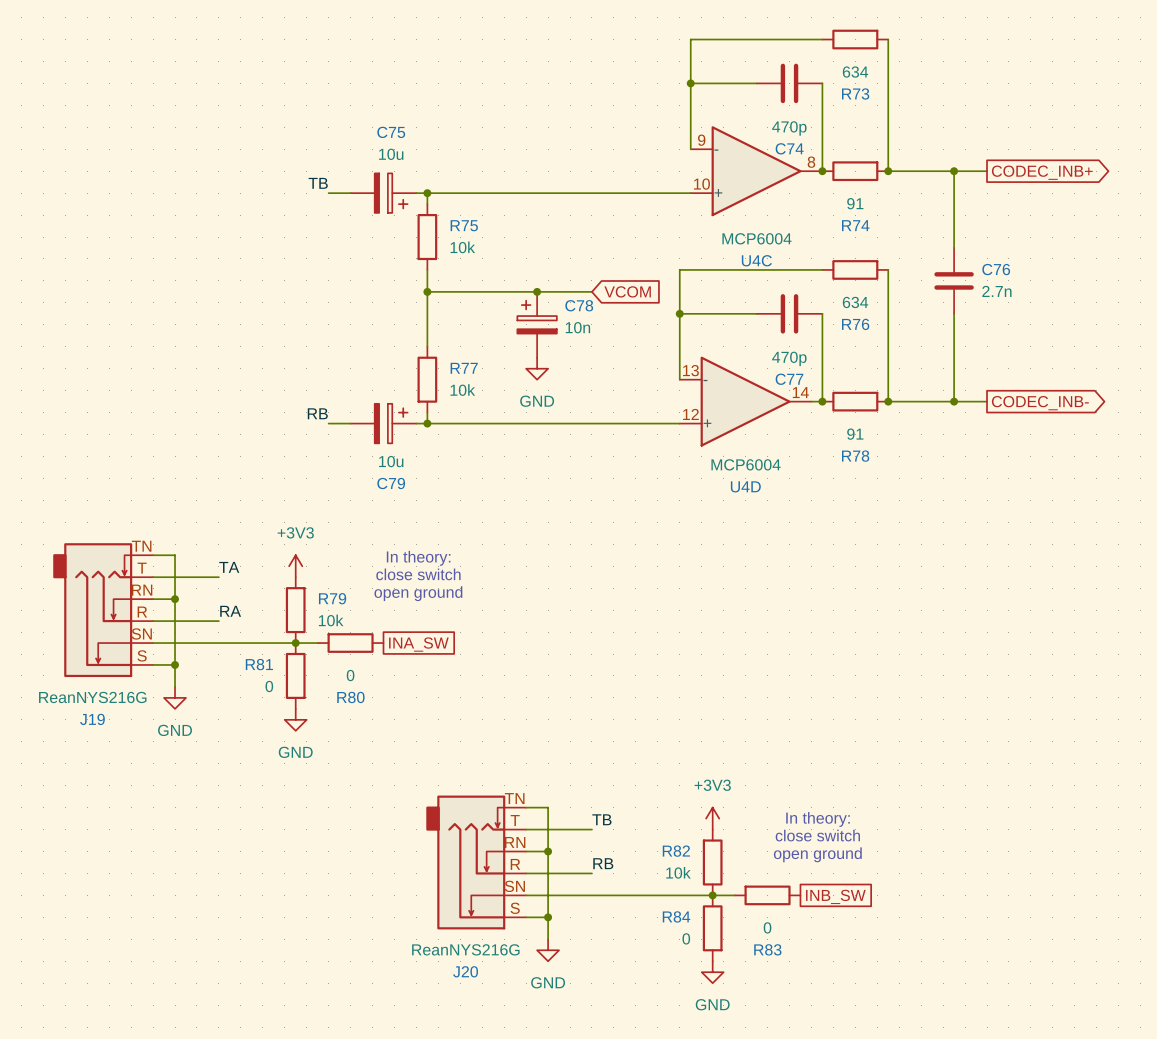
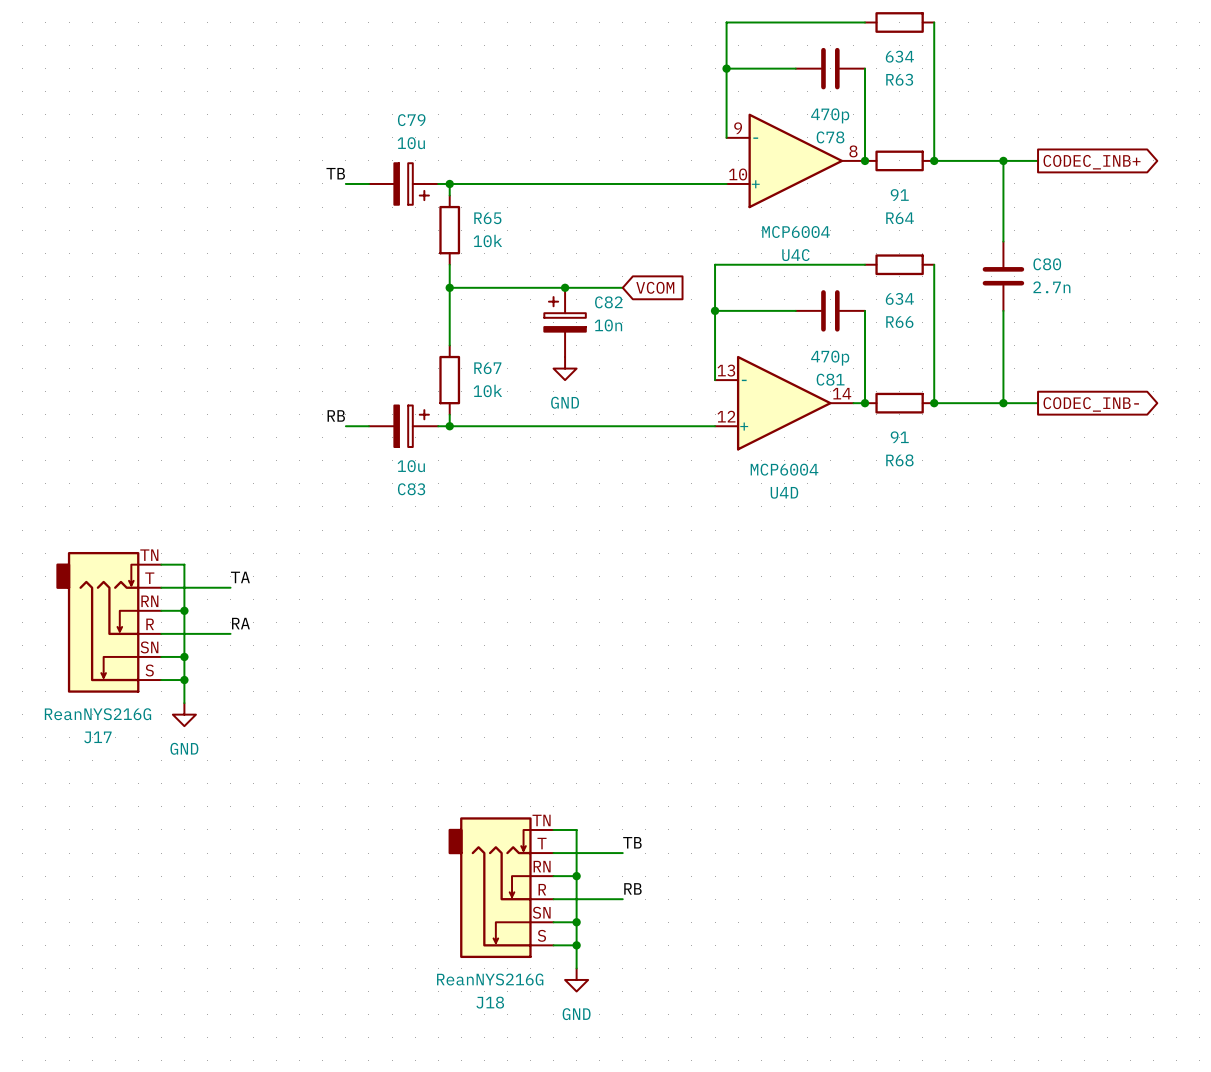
R73 name: R73 (855, 93) -> R63 (899, 79)
C75 name: C75 (391, 132) -> C79 (411, 120)
C74 name: C74 (789, 148) -> C78 (830, 137)
R75 name: R75 (464, 225) -> R65 (487, 218)
R74 name: R74 (855, 225) -> R64 (900, 218)
C76 name: C76 (996, 269) -> C80 (1047, 264)
C78 name: C78 (579, 305) -> C82 (608, 302)
R76 name: R76 (855, 324) -> R66 (899, 322)
R77 name: R77 (464, 368) -> R67 (487, 368)
C77 name: C77 (789, 379) -> C81 (830, 379)
R78 name: R78 (855, 456) -> R68 (899, 460)
C79 name: C79 (391, 483) -> C83 (411, 489)
text: In theory: (418, 558) -> none
power symbol: +3V3 (295, 566) -> none
text: close switch (418, 574) -> none
text: open ground (418, 593) -> none
R79: 10k (295, 610) -> none
wire: (175, 643) (317, 643) -> none
junction: none -> (184, 656)
junction: (295, 643) -> none
R80: 0 (350, 643) -> none
global label: INA_SW (418, 644) -> none
R81: 0 (295, 675) -> none
J19 name: J19 (92, 719) -> J17 (97, 737)
power symbol: GND (295, 719) -> none
power symbol: +3V3 (712, 818) -> none
text: In theory: (818, 819) -> none
text: close switch (817, 835) -> none
text: open ground (817, 854) -> none
R82: 10k (712, 862) -> none
wire: (548, 895) (734, 895) -> none
junction: none -> (576, 922)
junction: (712, 895) -> none
R83: 0 (767, 895) -> none
global label: INB_SW (835, 896) -> none
R84: 0 (712, 928) -> none
J20 name: J20 (465, 971) -> J18 (490, 1002)
power symbol: GND (712, 972) -> none

